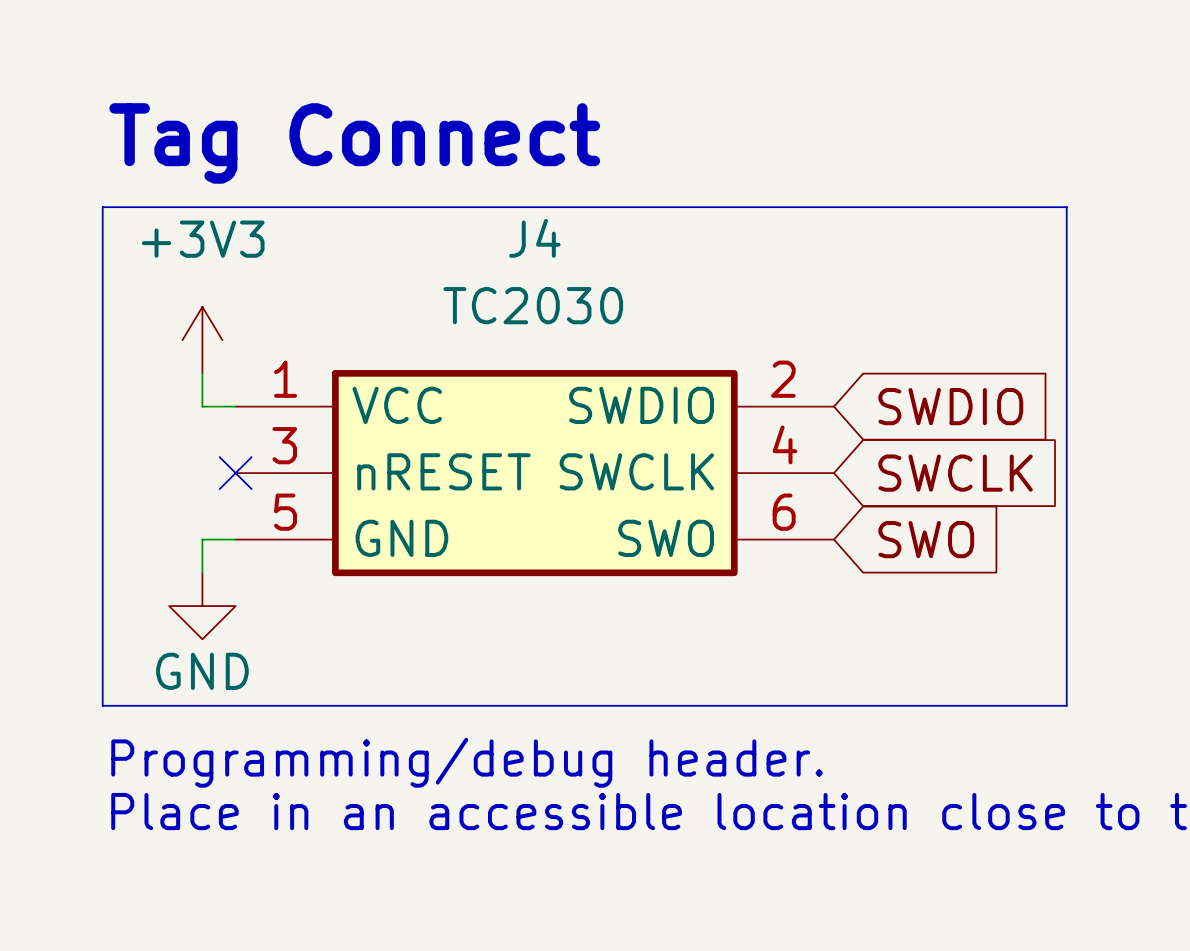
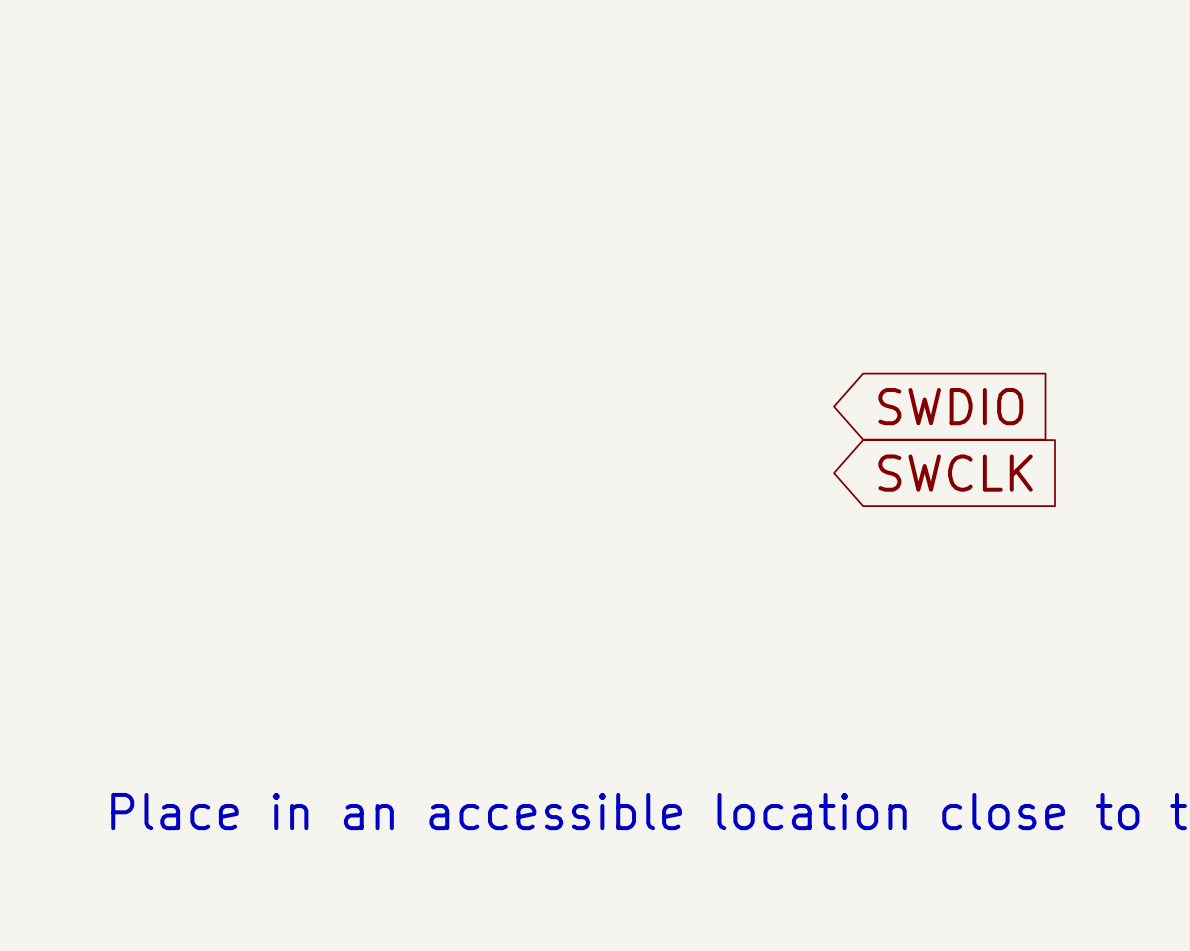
text: Tag Connect (354, 143) -> none
line: (102, 207) (102, 705) (1066, 705) (1066, 207) (102, 207) -> none
power symbol: +3V3 (202, 340) -> none
wire: (202, 373) (202, 406) (235, 406) -> none
no-connect mark: (235, 473) -> none
J4: TC2030 (534, 473) -> none
wire: (235, 539) (202, 539) (202, 572) -> none
global label: SWO (926, 539) -> none
power symbol: GND (202, 606) -> none
text: Programming/debug header. (467, 762) -> none

